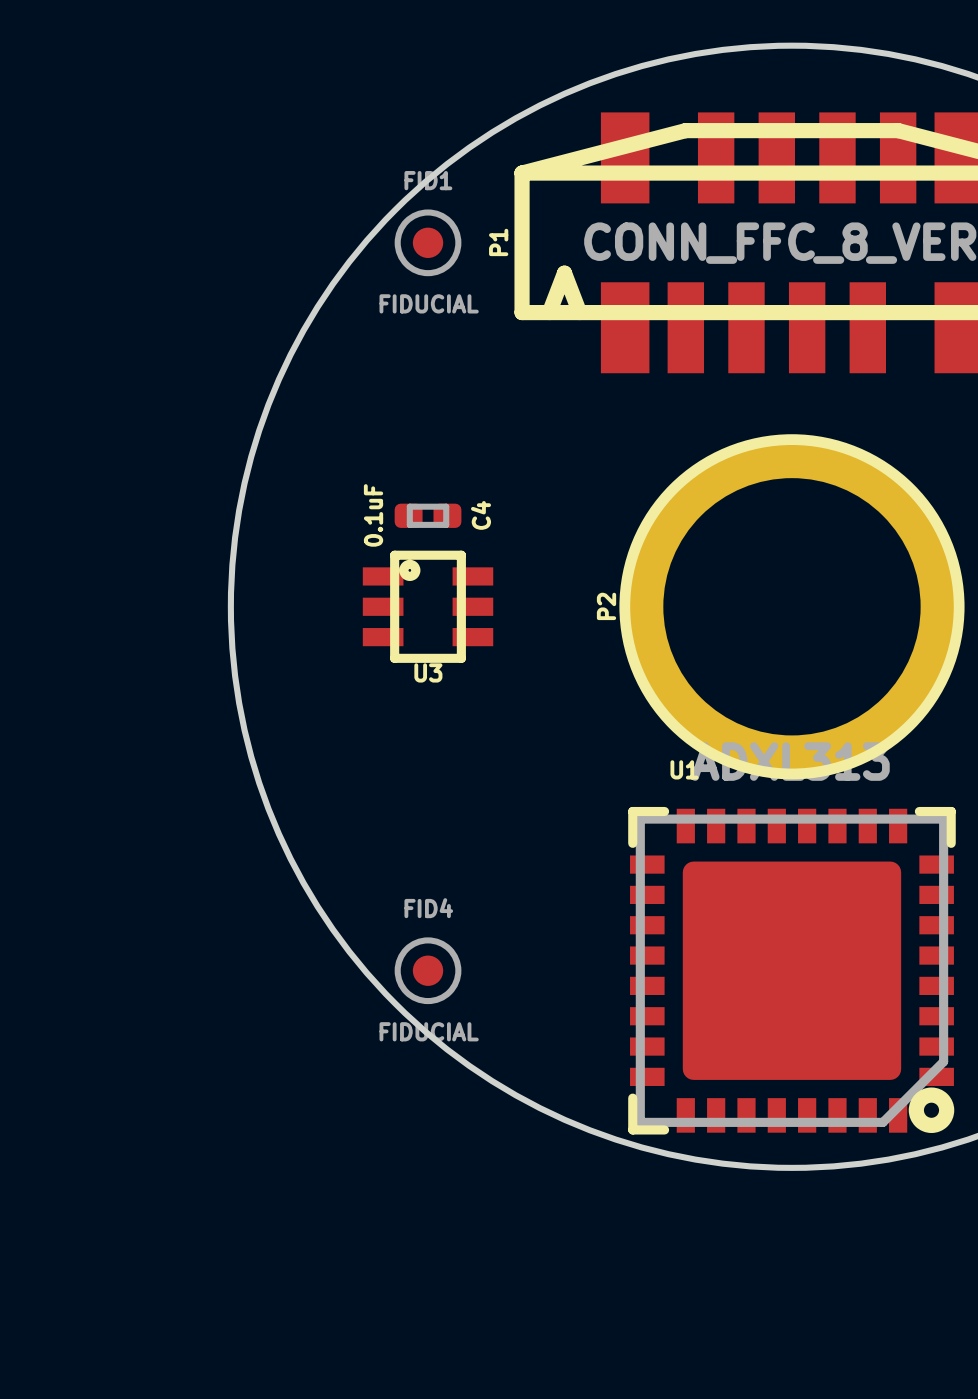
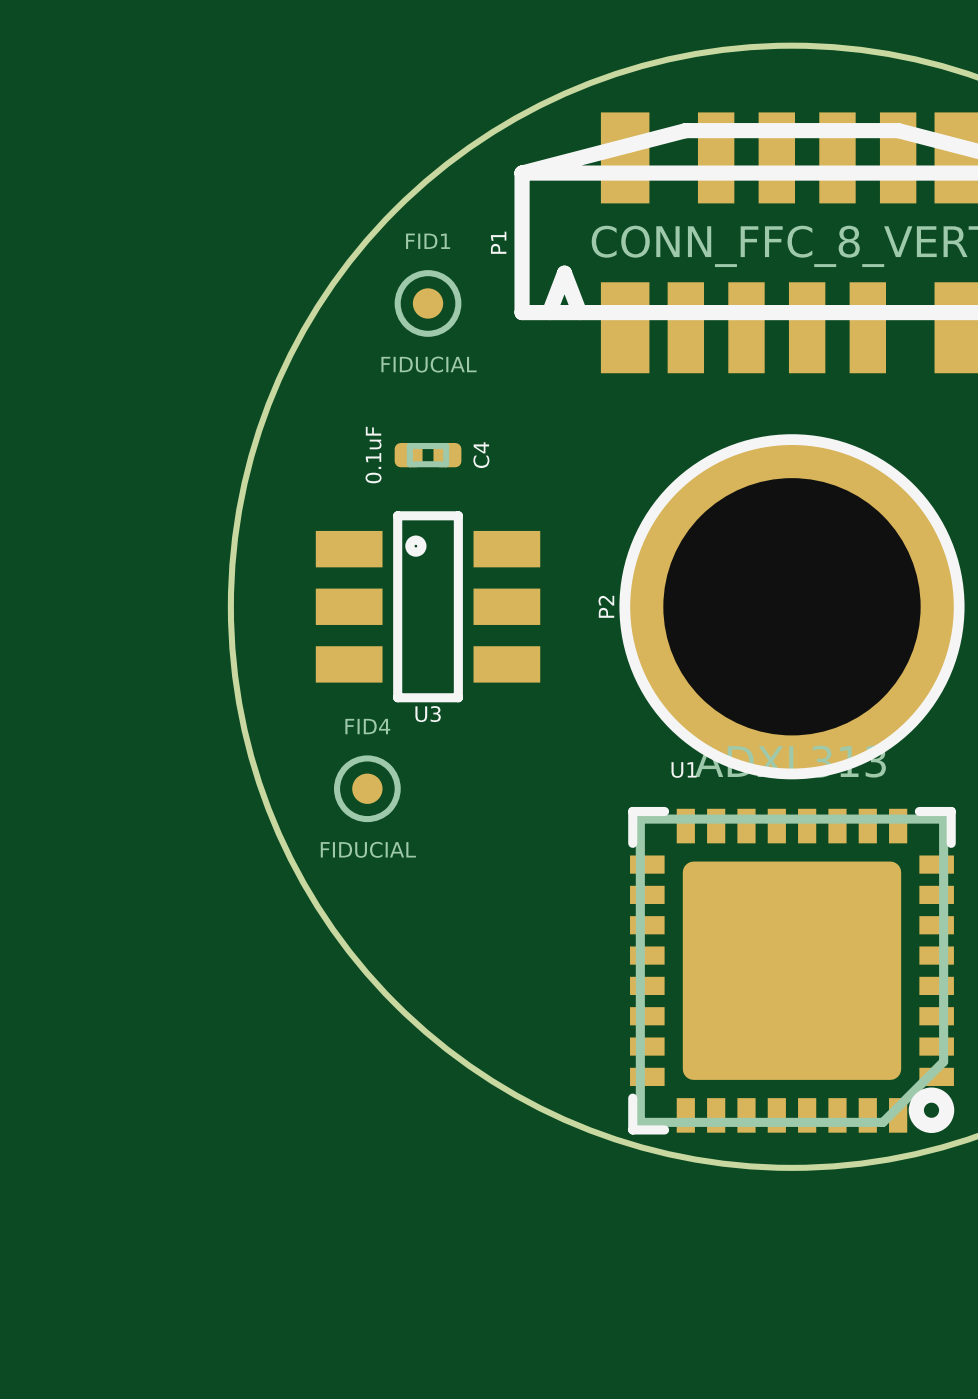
FID1 position: (428, 242) -> (428, 303)
C4 position: (428, 515) -> (428, 455)
U3 footprint: [362, 550, 494, 663] -> [315, 511, 541, 703]
U3 name position: U3 (428, 672) -> U3 (428, 714)
FID4 position: (428, 970) -> (367, 788)

